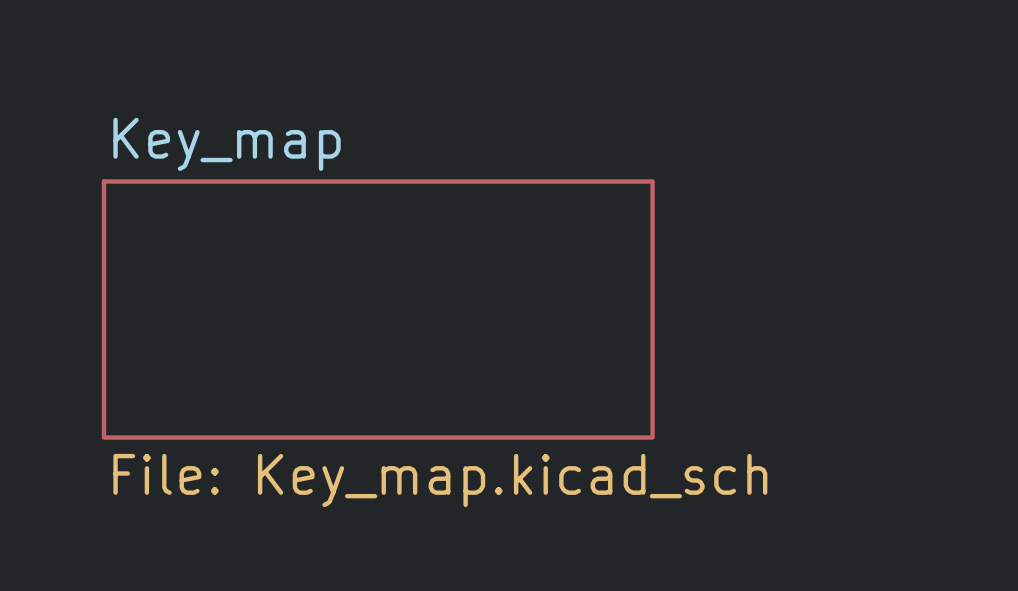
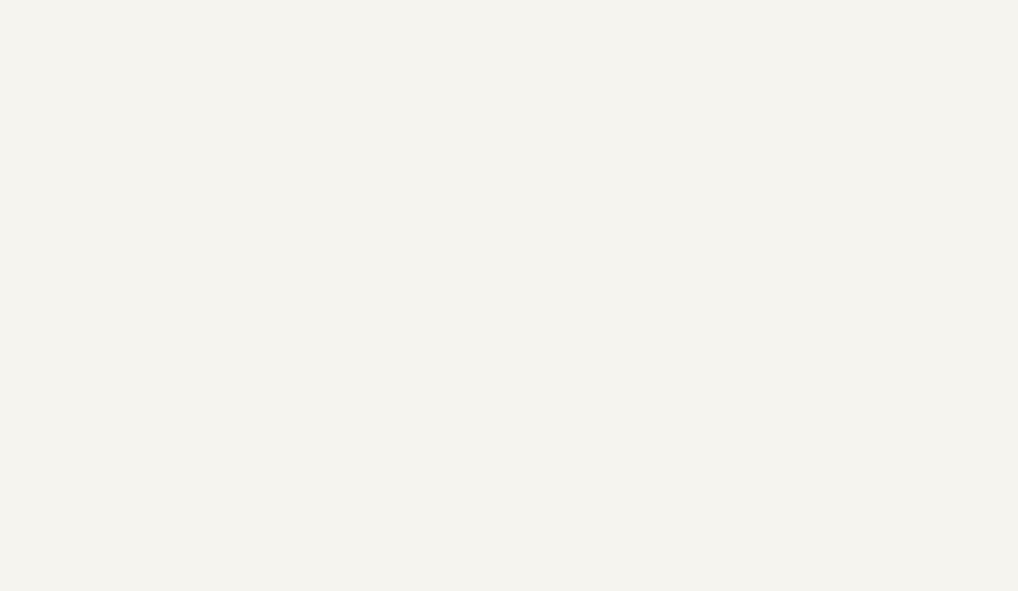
sheet Key_map: File: Key_map.kicad_sch (378, 309) -> none

